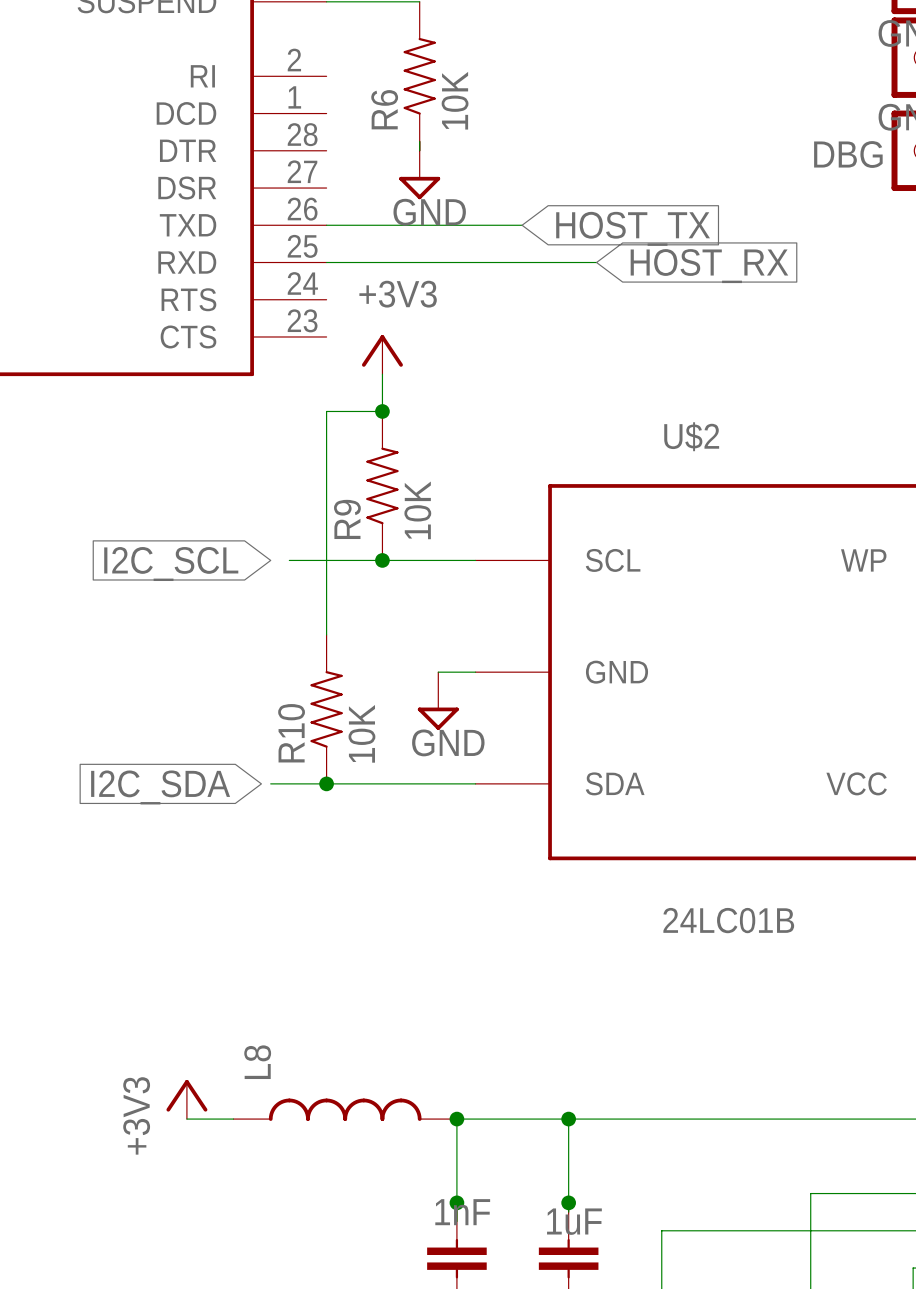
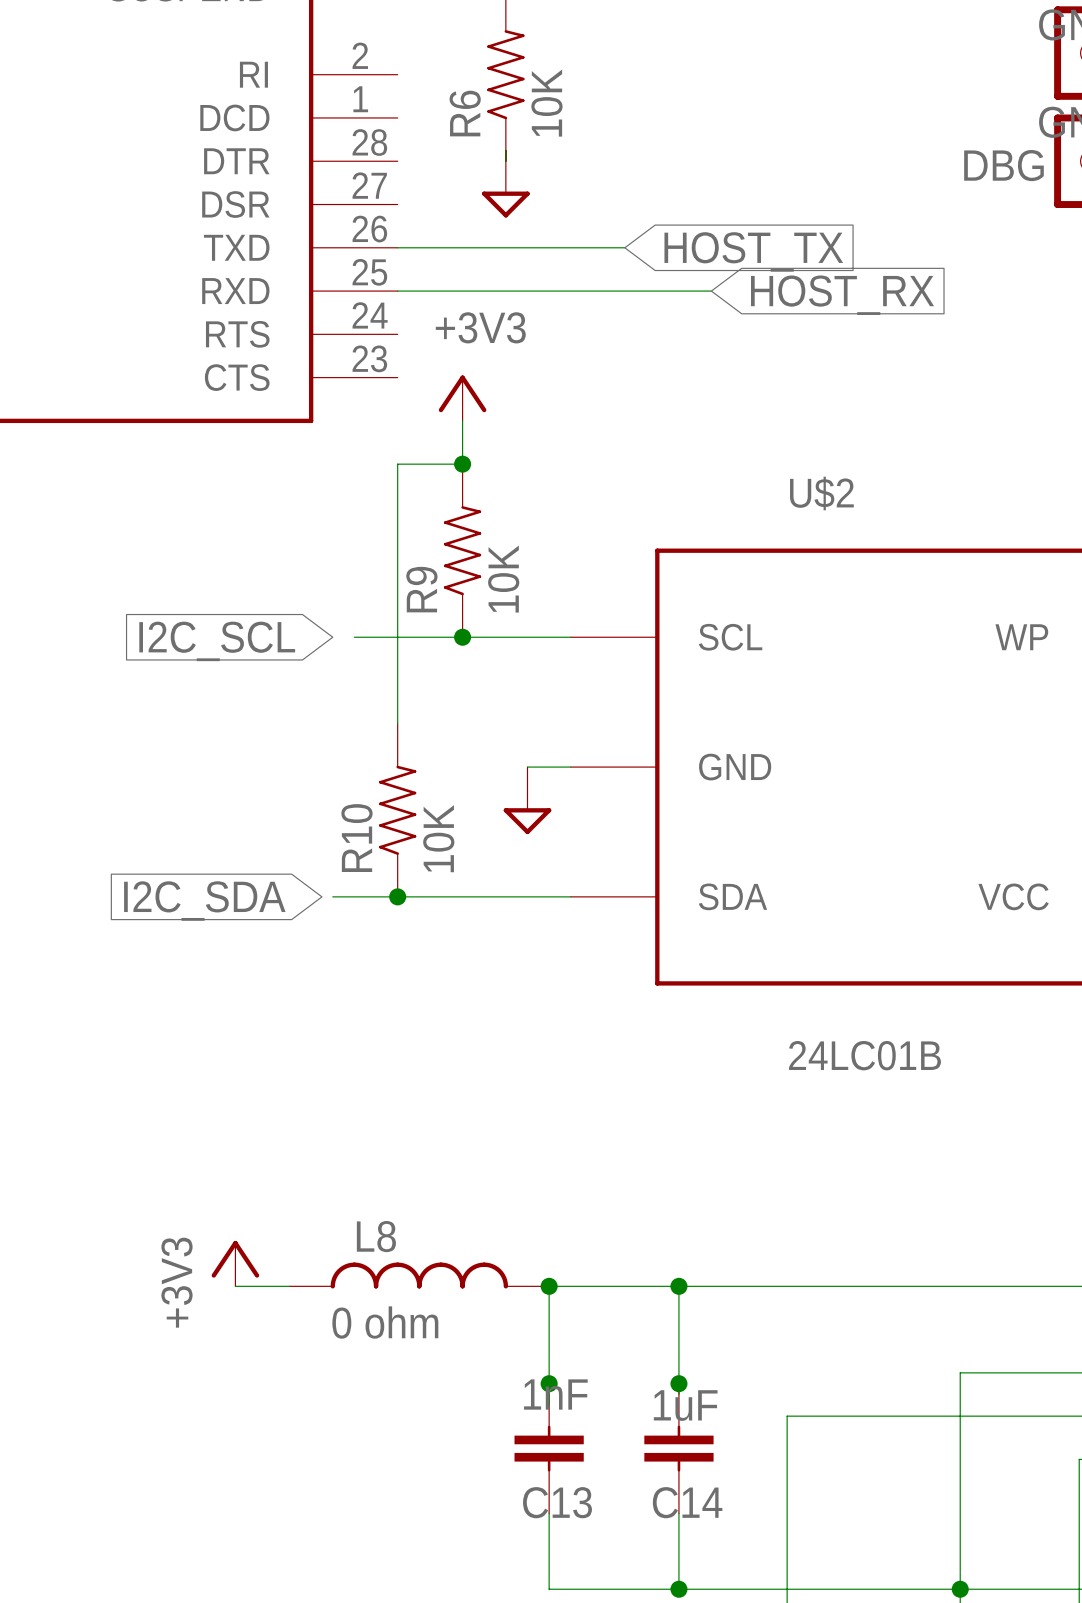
power symbol text: GND (429, 212) -> none
power symbol text: GND (448, 742) -> none
L8 name rotation: 0° (257, 1062) -> 90° clockwise (376, 1236)
L8 value: none -> 0 ohm (385, 1322)

